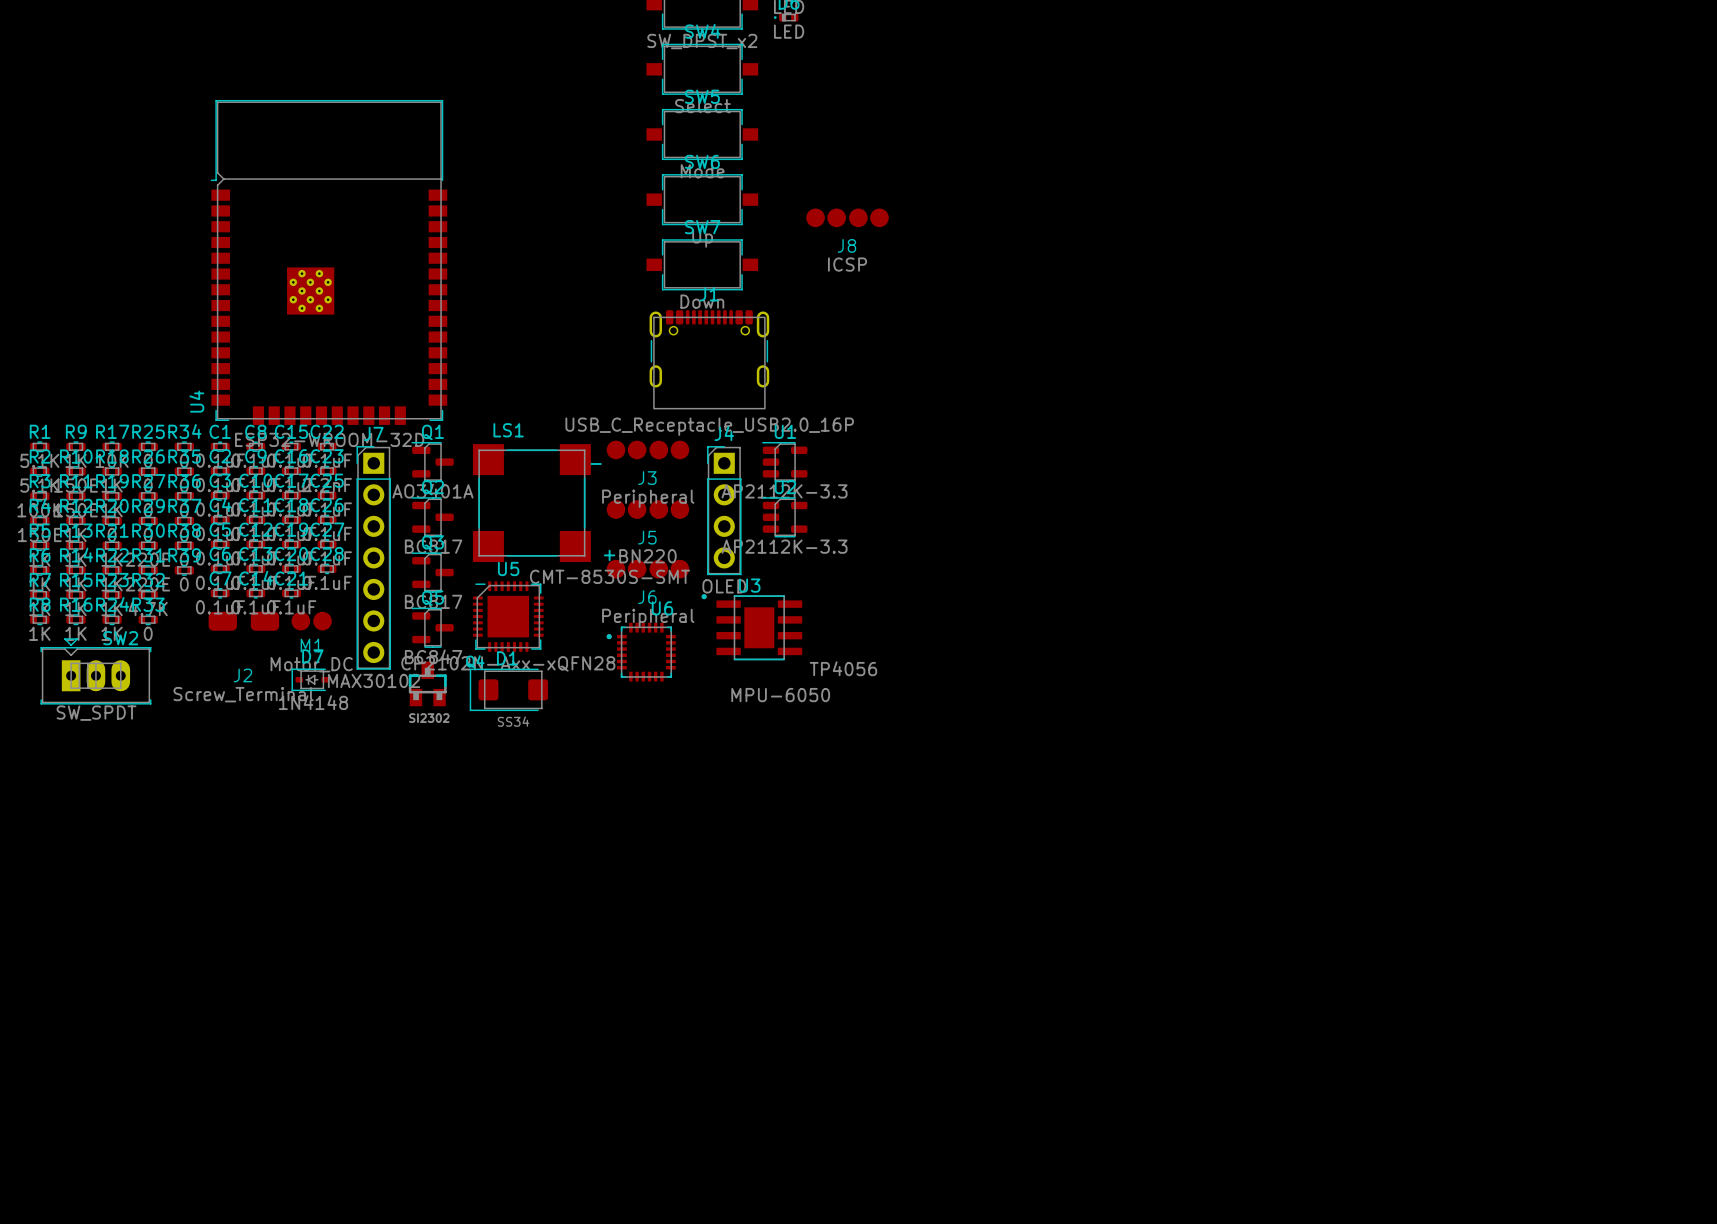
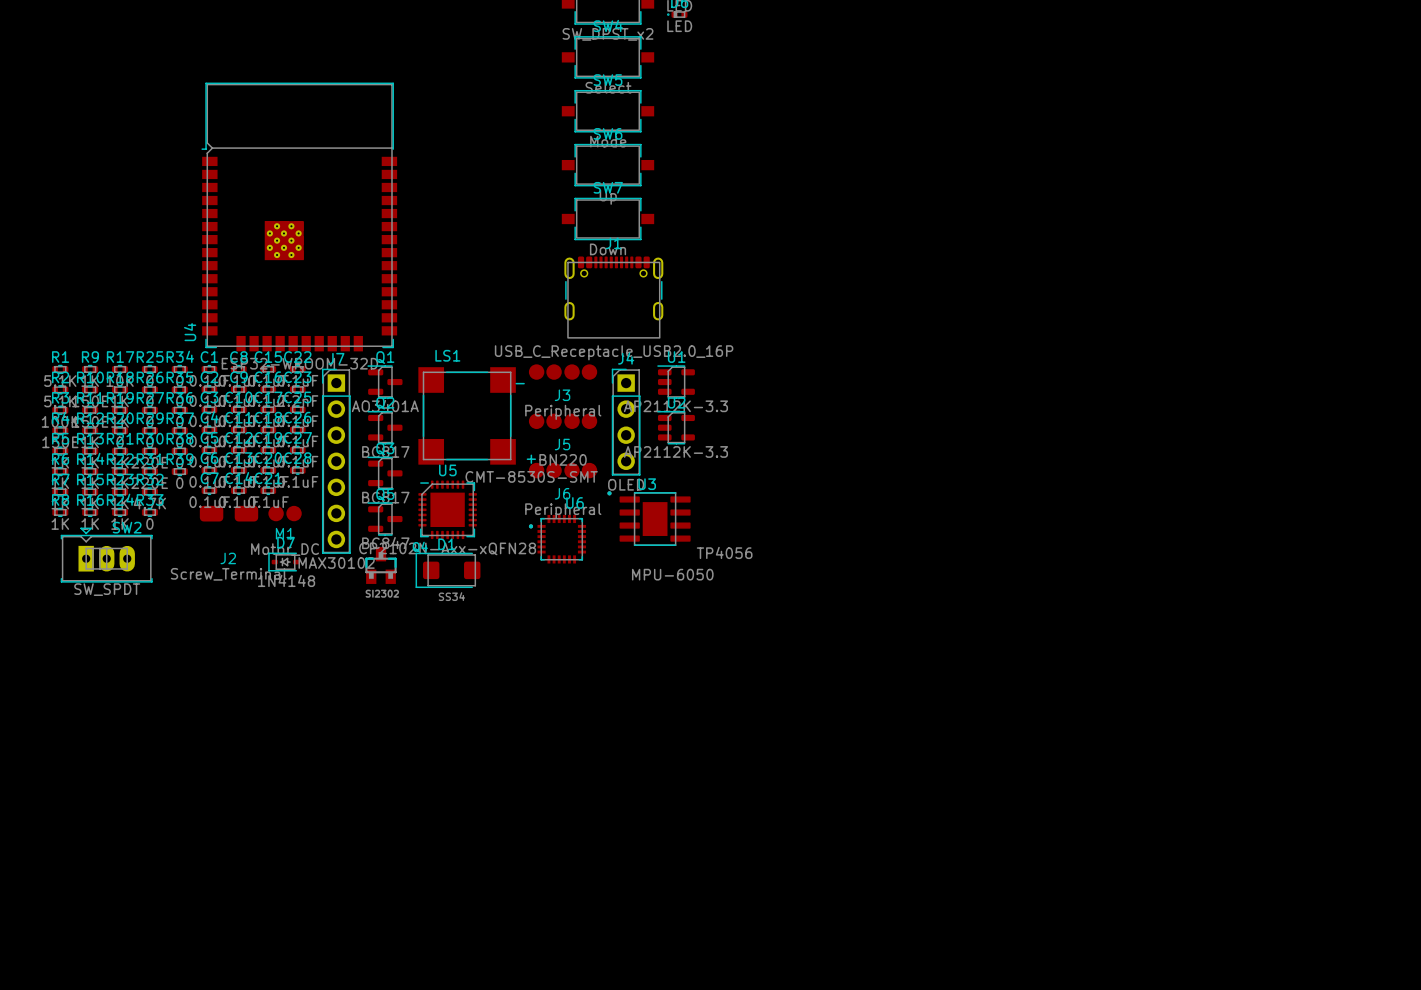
J8: ICSP (847, 217) -> none

